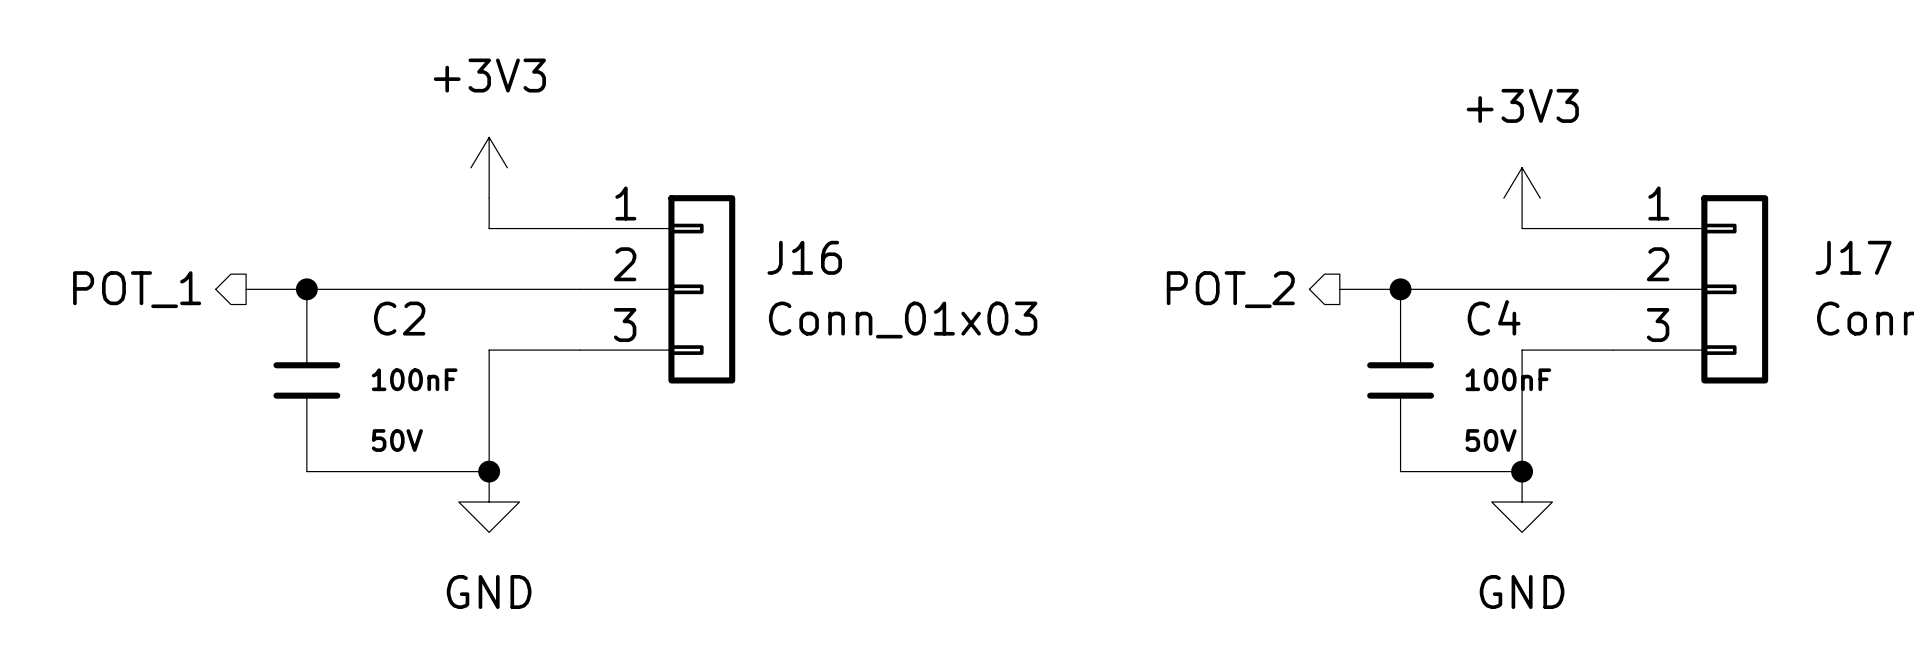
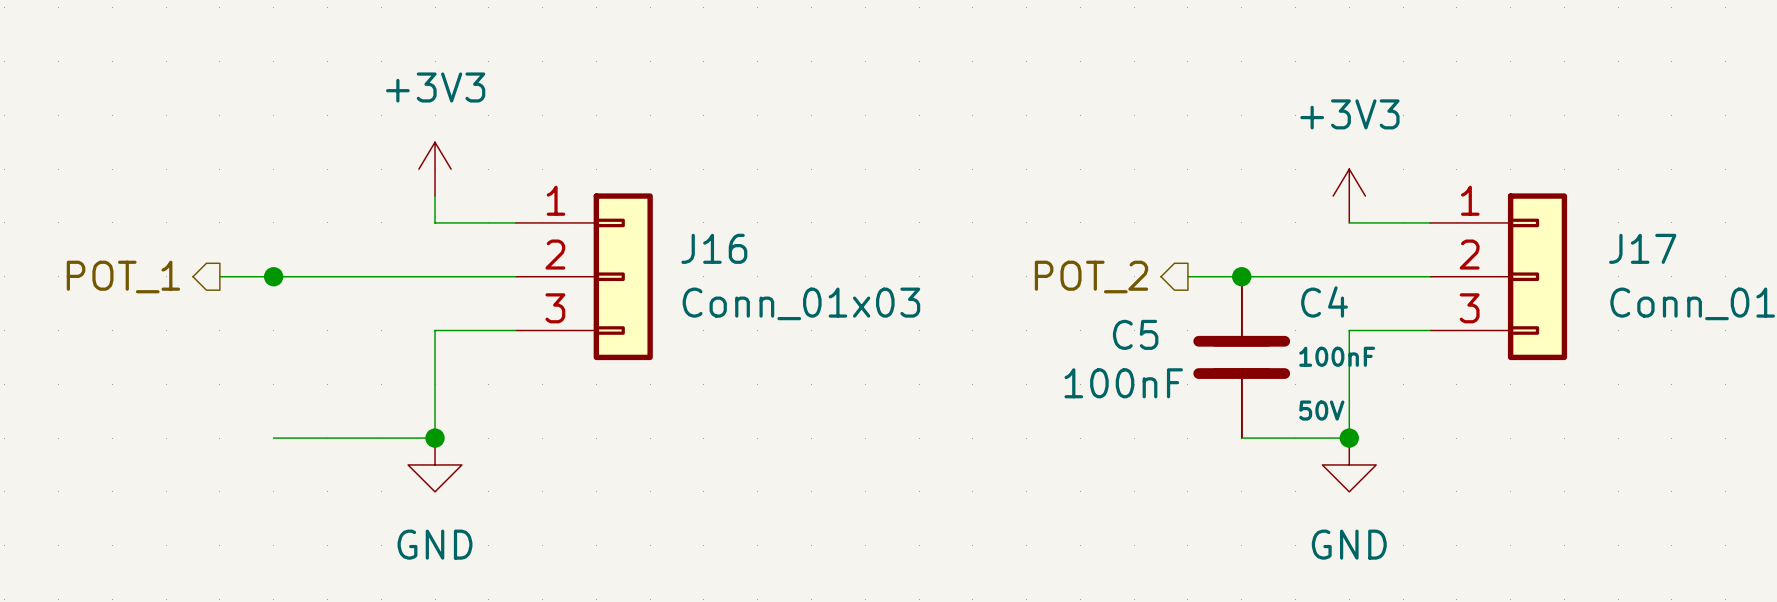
C2: 100nF (306, 380) -> none
C5: none -> 100nF (1241, 357)

